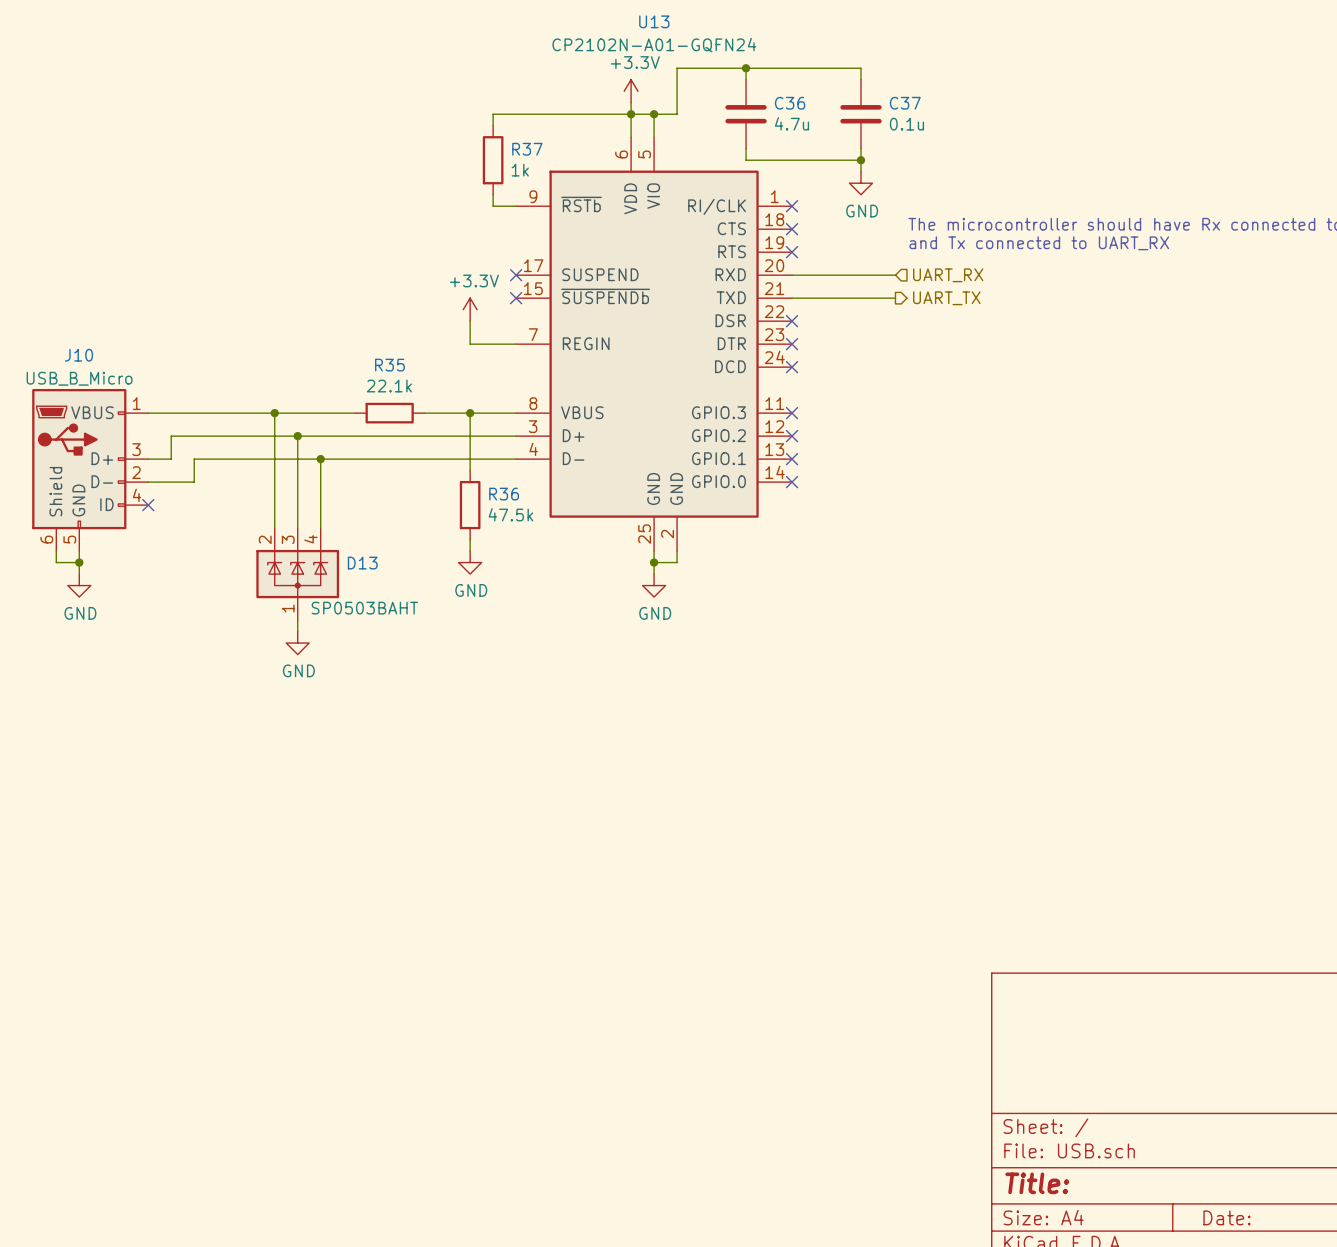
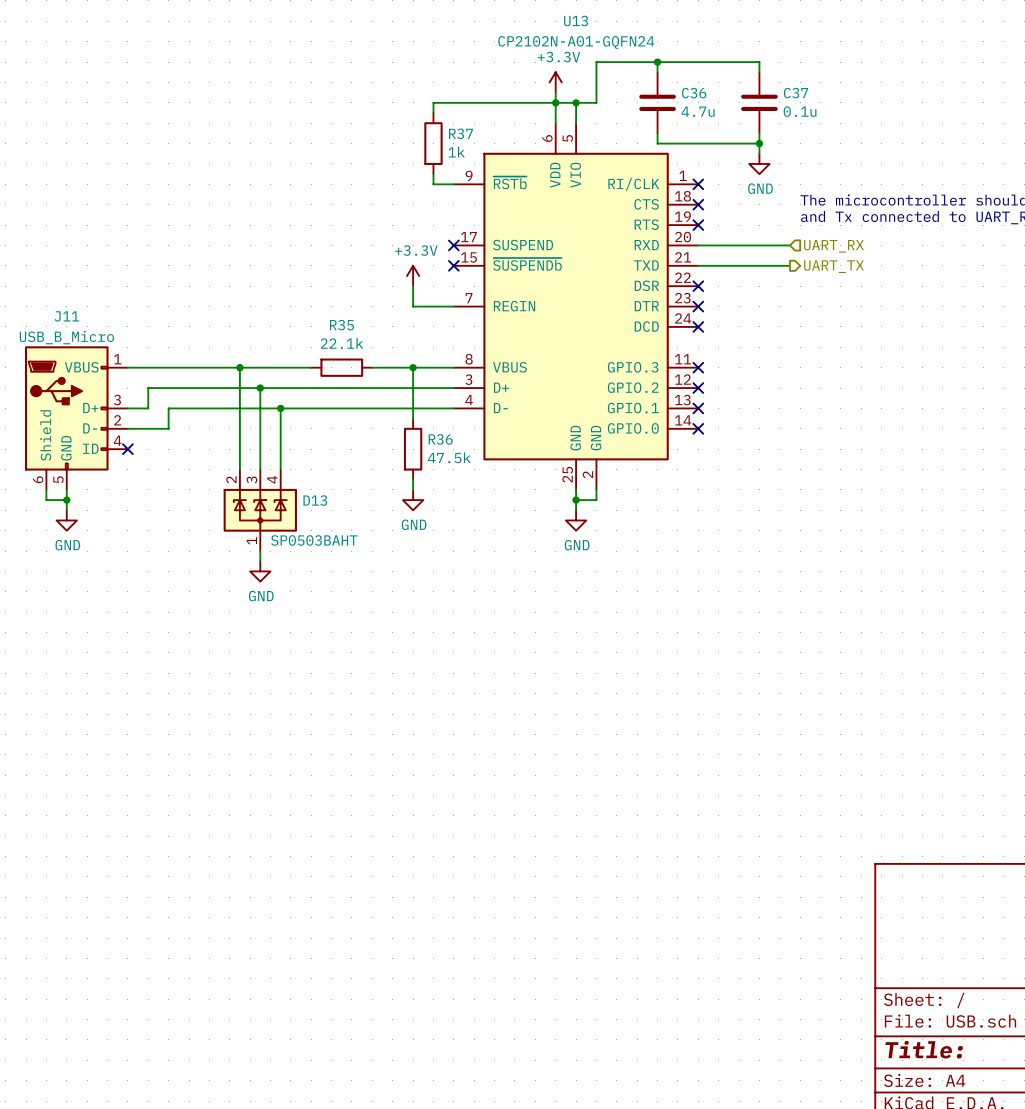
J10 name: J10 (79, 355) -> J11 (66, 316)

